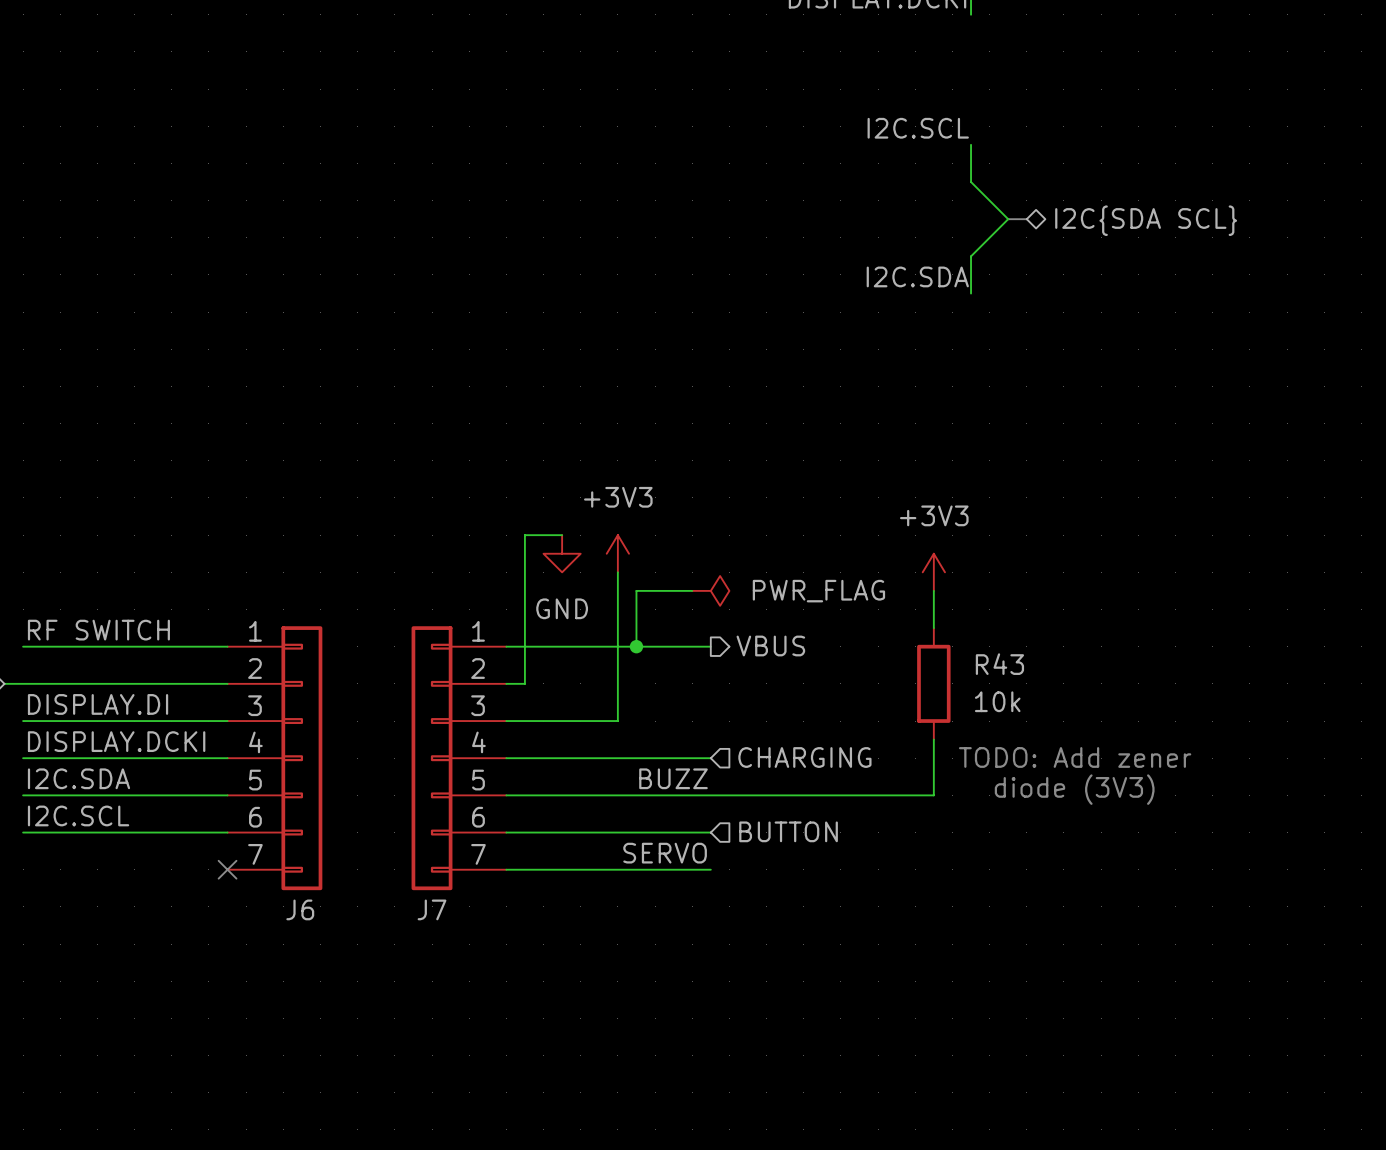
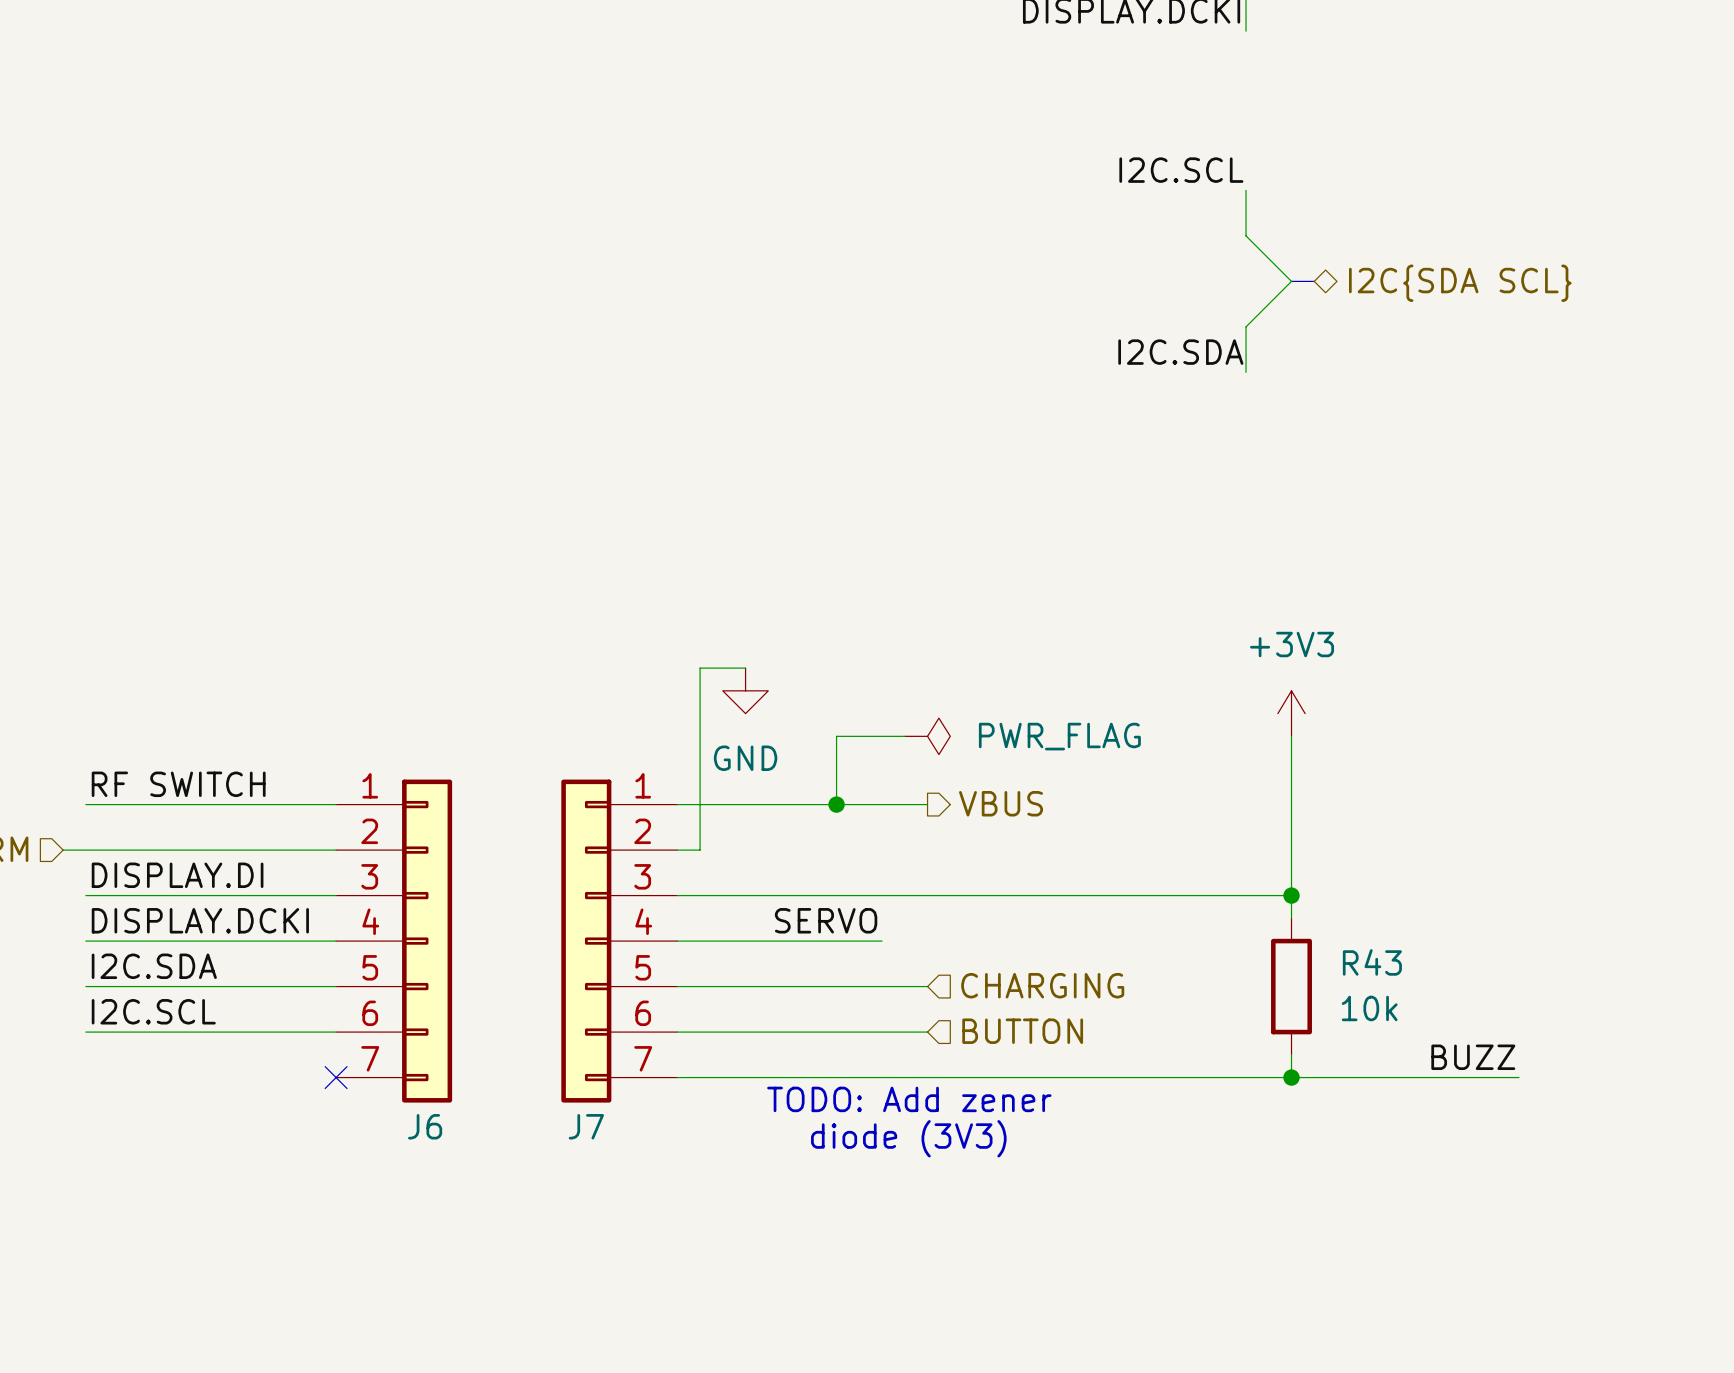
power symbol: +3V3 (617, 553) -> none
wire: (617, 572) (617, 721) -> (1291, 895) (813, 895)
power symbol position: +3V3 (933, 572) -> +3V3 (1291, 713)
wire: (933, 590) (933, 628) -> none
wire: none -> (1291, 736) (1291, 918)
R43 position: (933, 683) -> (1291, 986)
junction: none -> (1291, 895)
wire: (933, 739) (933, 795) (710, 795) -> none
hierarchical label position: CHARGING (804, 757) -> CHARGING (1042, 985)
text: TODO: Add zener (1075, 757) -> none
wire: (673, 758) (710, 758) -> none
label: BUZZ (673, 778) -> none
text: diode (3V3) (1074, 789) -> none
wire: none -> (1291, 1054) (1291, 1077)
label position: SERVO (665, 853) -> SERVO (826, 920)
label: none -> BUZZ (1473, 1057)
wire: none -> (927, 1077) (1518, 1077)
junction: none -> (1291, 1077)
text: none -> TODO: Add zener (909, 1099)
text: none -> diode (3V3) (908, 1138)

